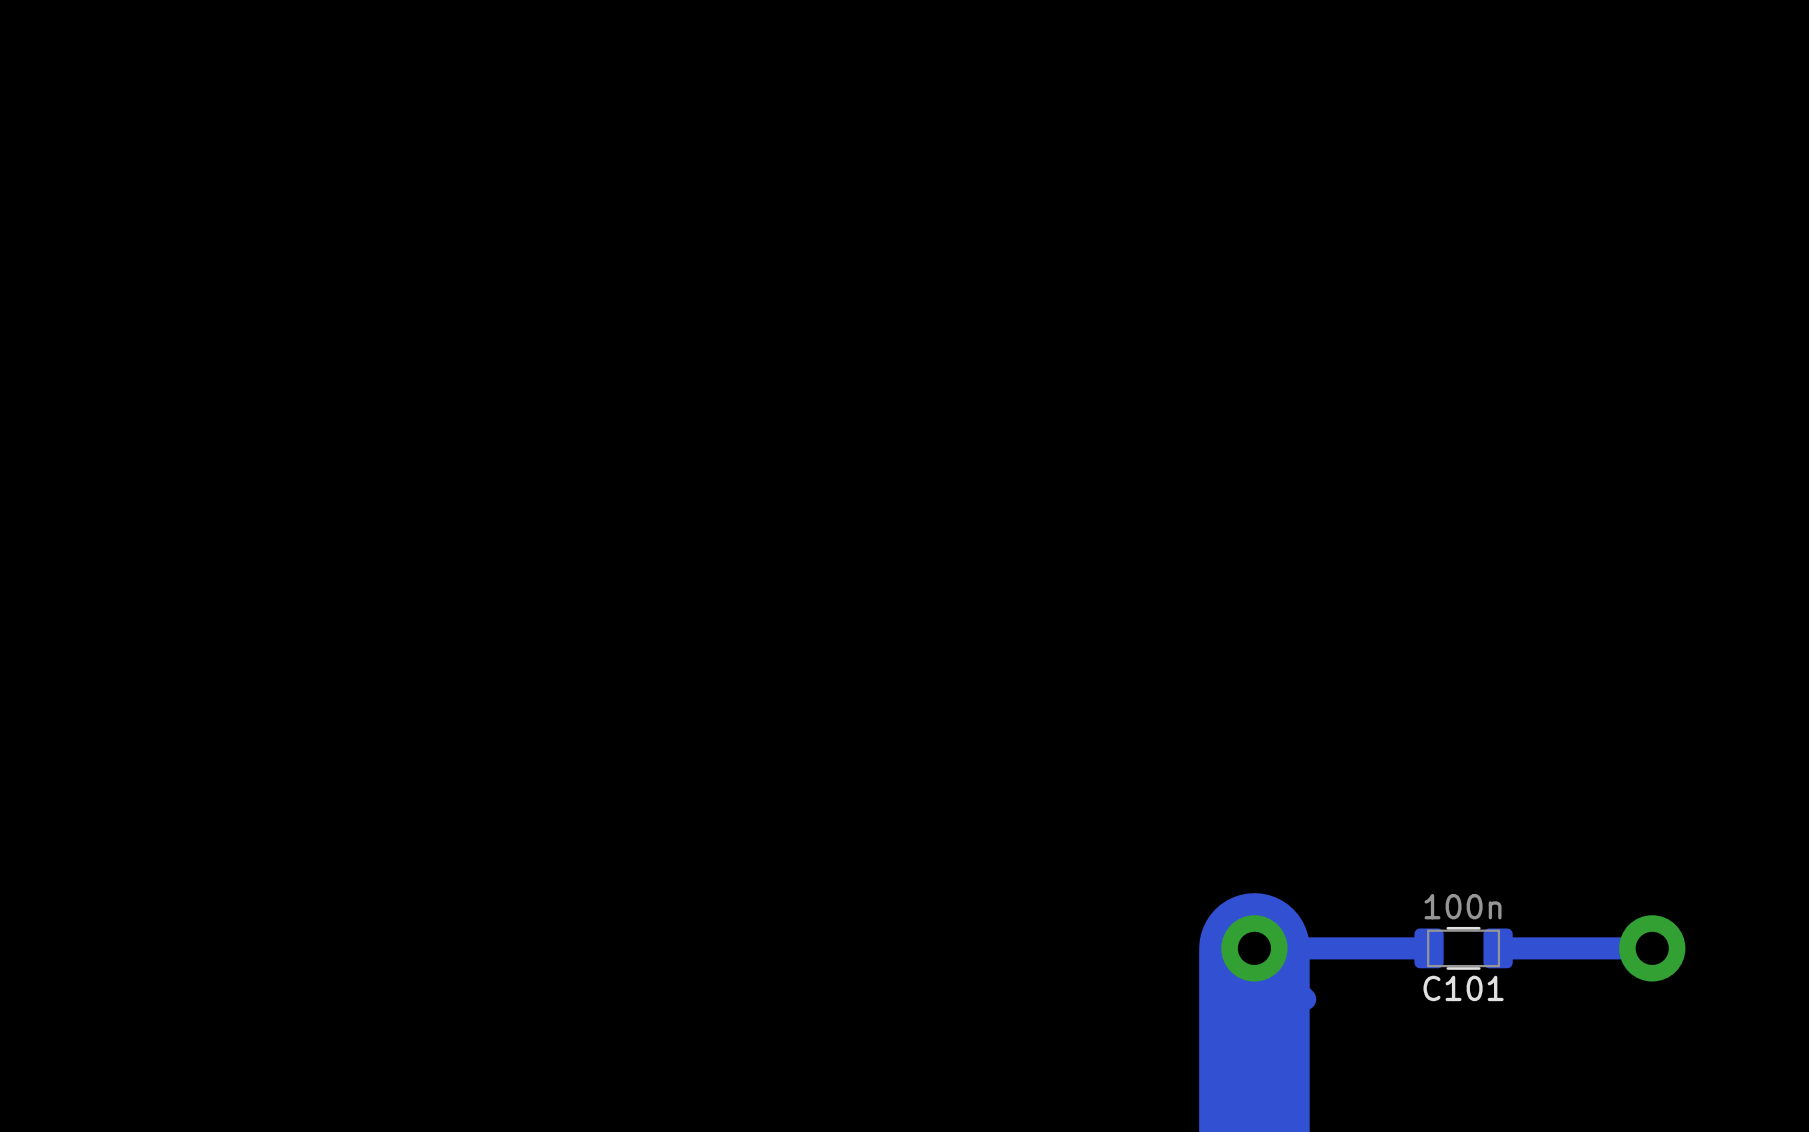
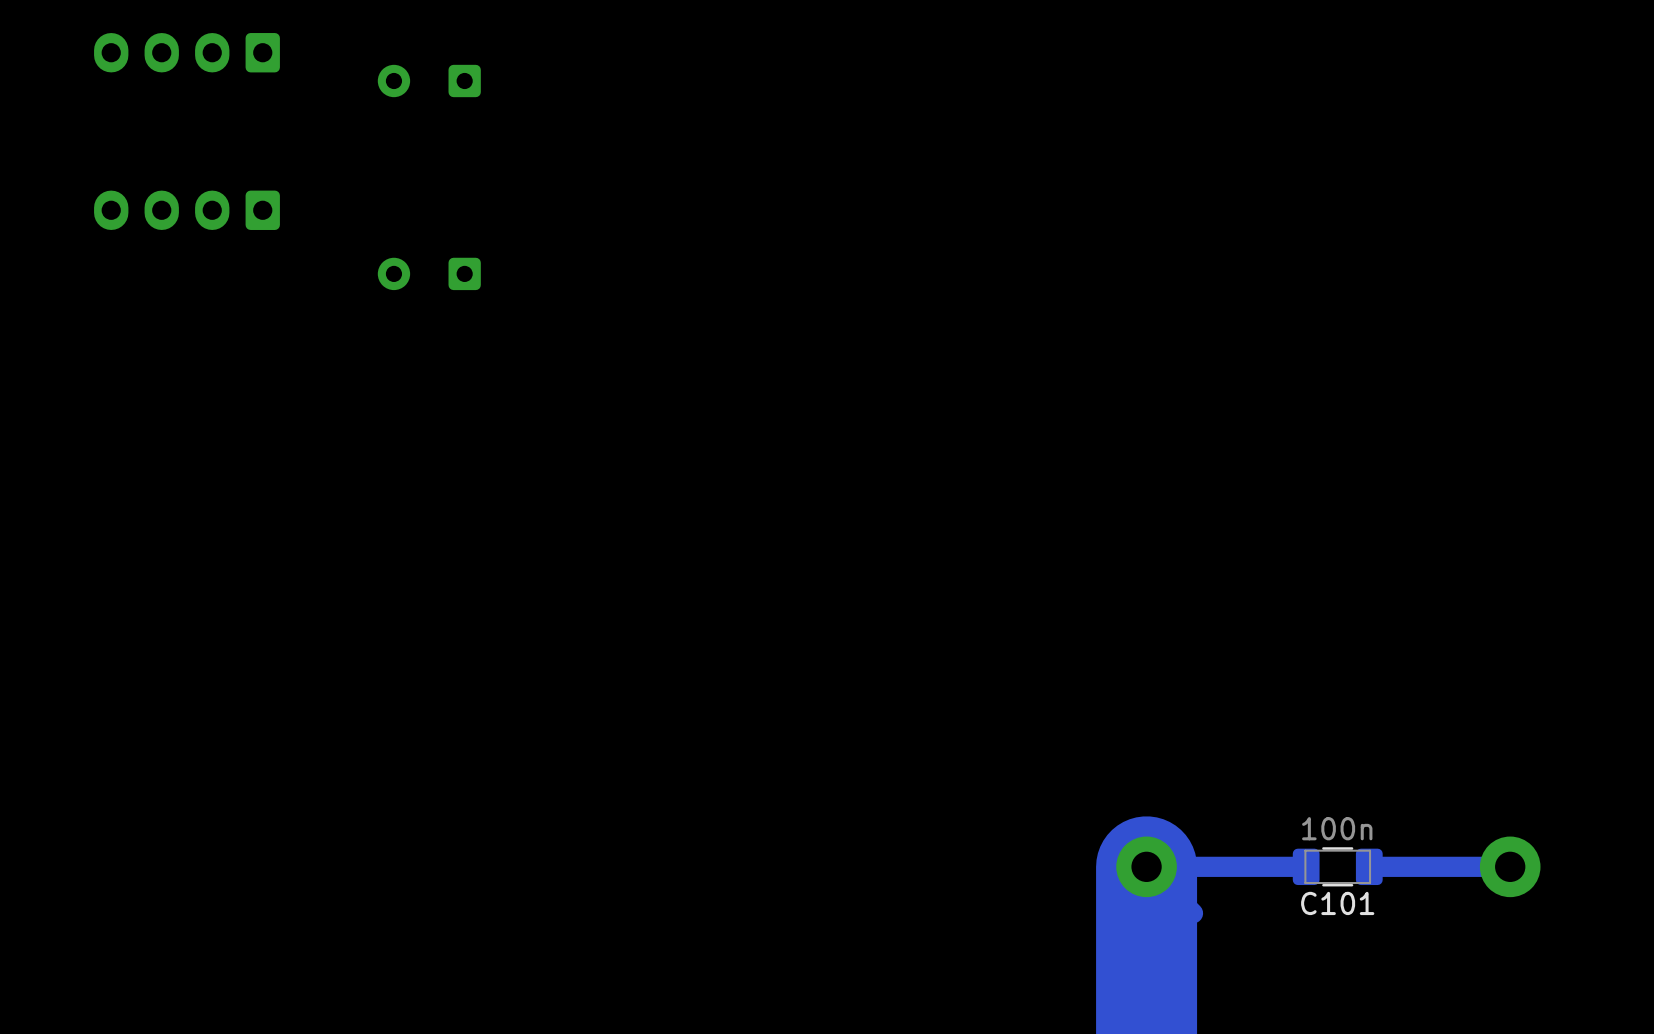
part: none -> (186, 52)
part: none -> (429, 81)
part: none -> (186, 210)
part: none -> (429, 273)

